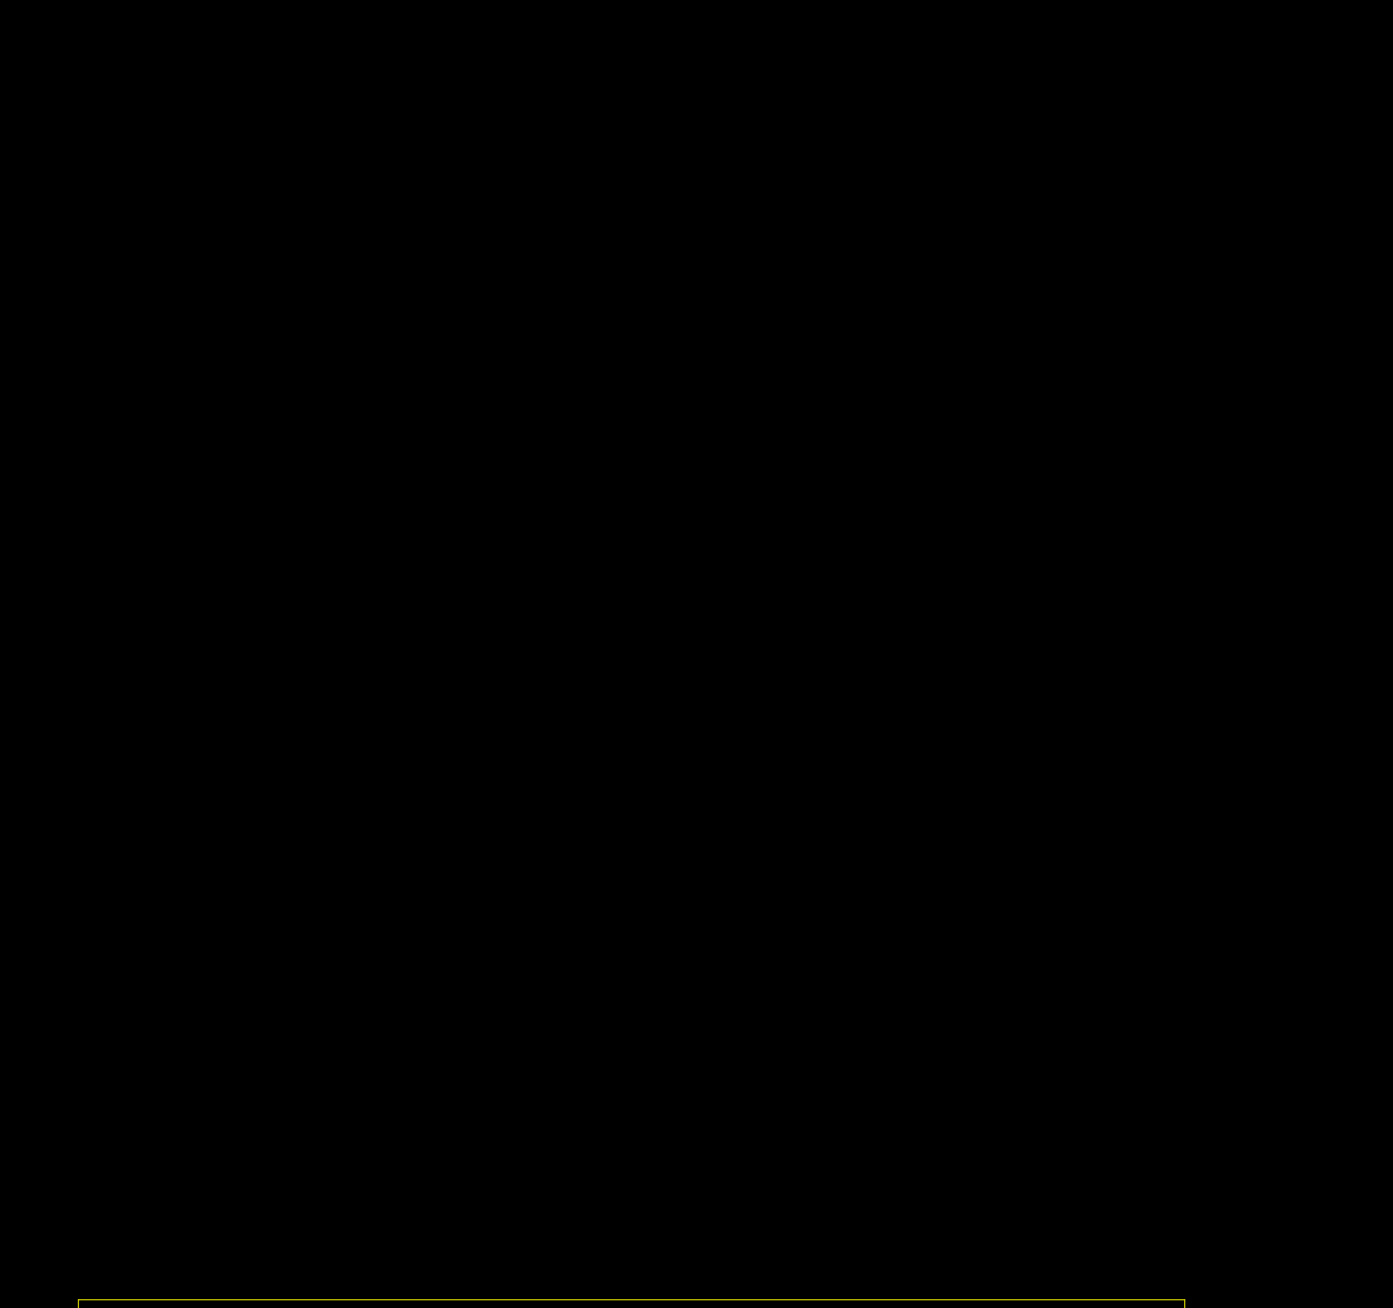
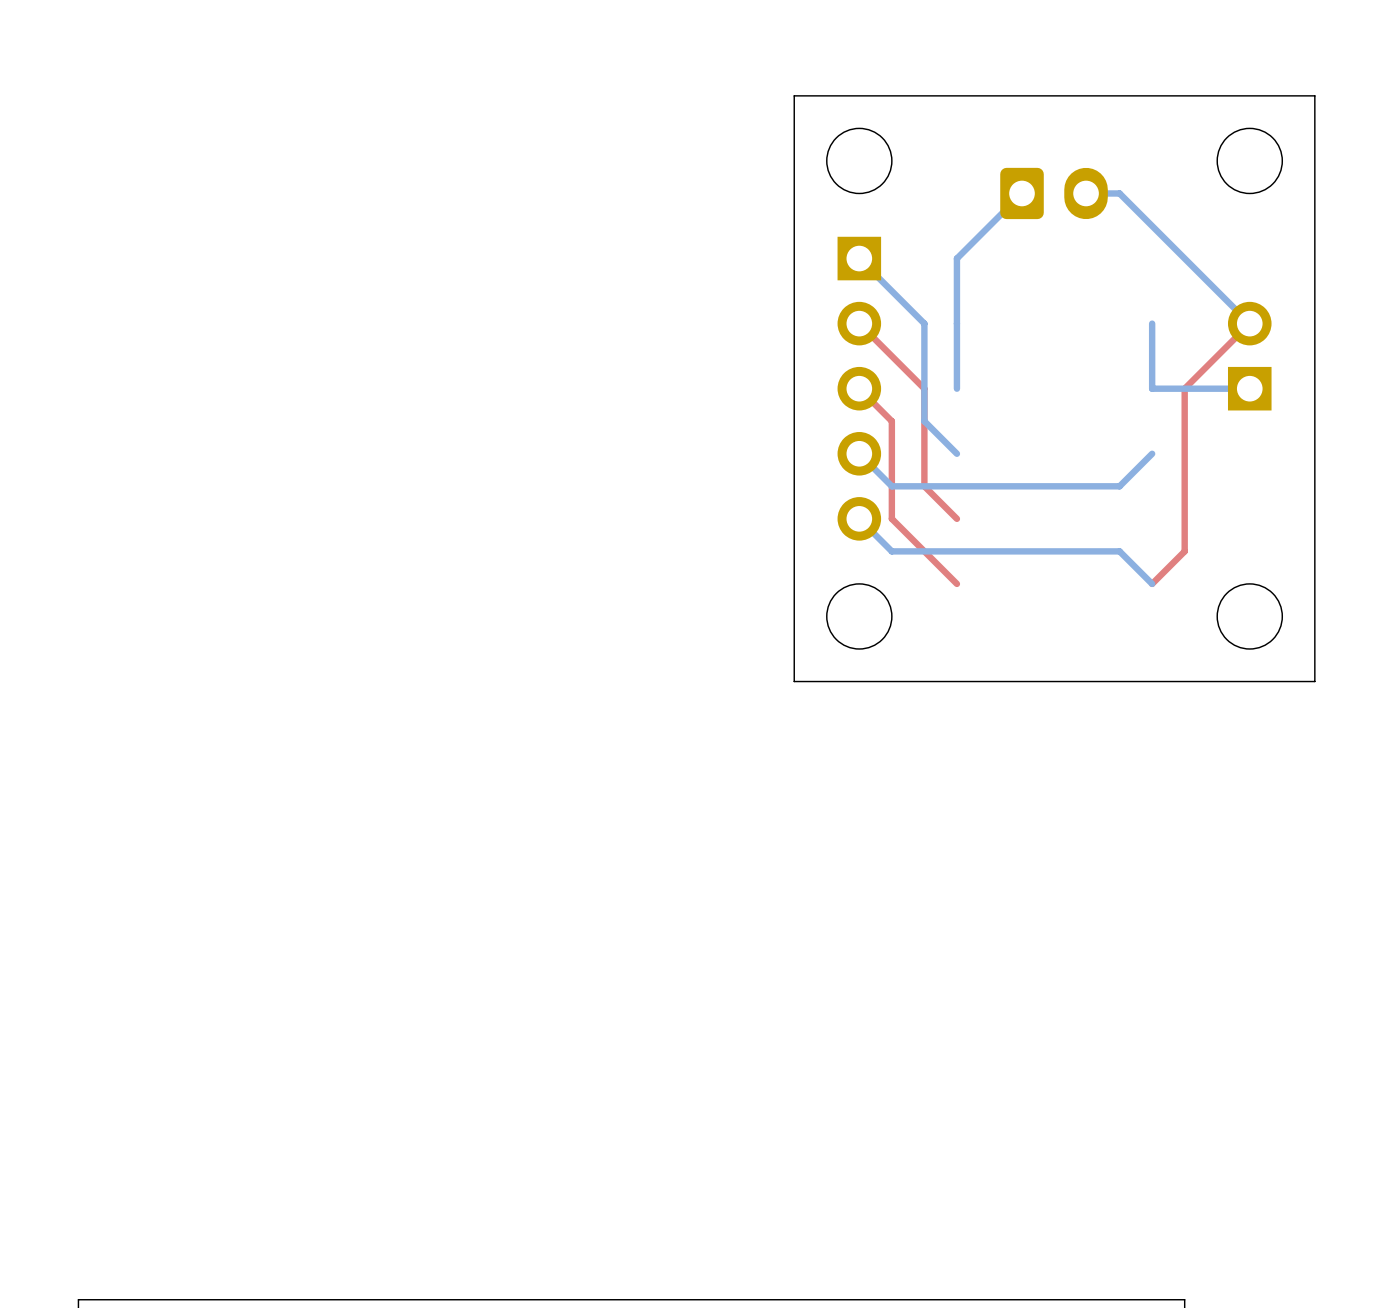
board edge: none -> (1314, 95) (794, 95) (794, 681) (1314, 681) (1314, 95)
round board edge: none -> [826, 127, 893, 195]
round board edge: none -> [1216, 127, 1283, 195]
bottom track: none -> (1022, 193) (956, 258) (956, 388)
part: none -> (1054, 193)
bottom track: none -> (1086, 193) (1119, 193) (1249, 323)
bottom track: none -> (859, 258) (924, 323) (924, 421) (956, 453)
top track: none -> (859, 323) (924, 388) (924, 486) (956, 518)
bottom track: none -> (1152, 323) (1152, 388) (1249, 388)
top track: none -> (1249, 323) (1184, 388) (1184, 551) (1152, 583)
part: none -> (1249, 356)
top track: none -> (859, 388) (891, 421) (891, 518) (956, 583)
part: none -> (859, 388)
bottom track: none -> (1152, 453) (1119, 486) (891, 486) (859, 453)
bottom track: none -> (859, 518) (891, 551) (1119, 551) (1152, 583)
round board edge: none -> [826, 583, 893, 650]
round board edge: none -> [1216, 583, 1283, 650]

